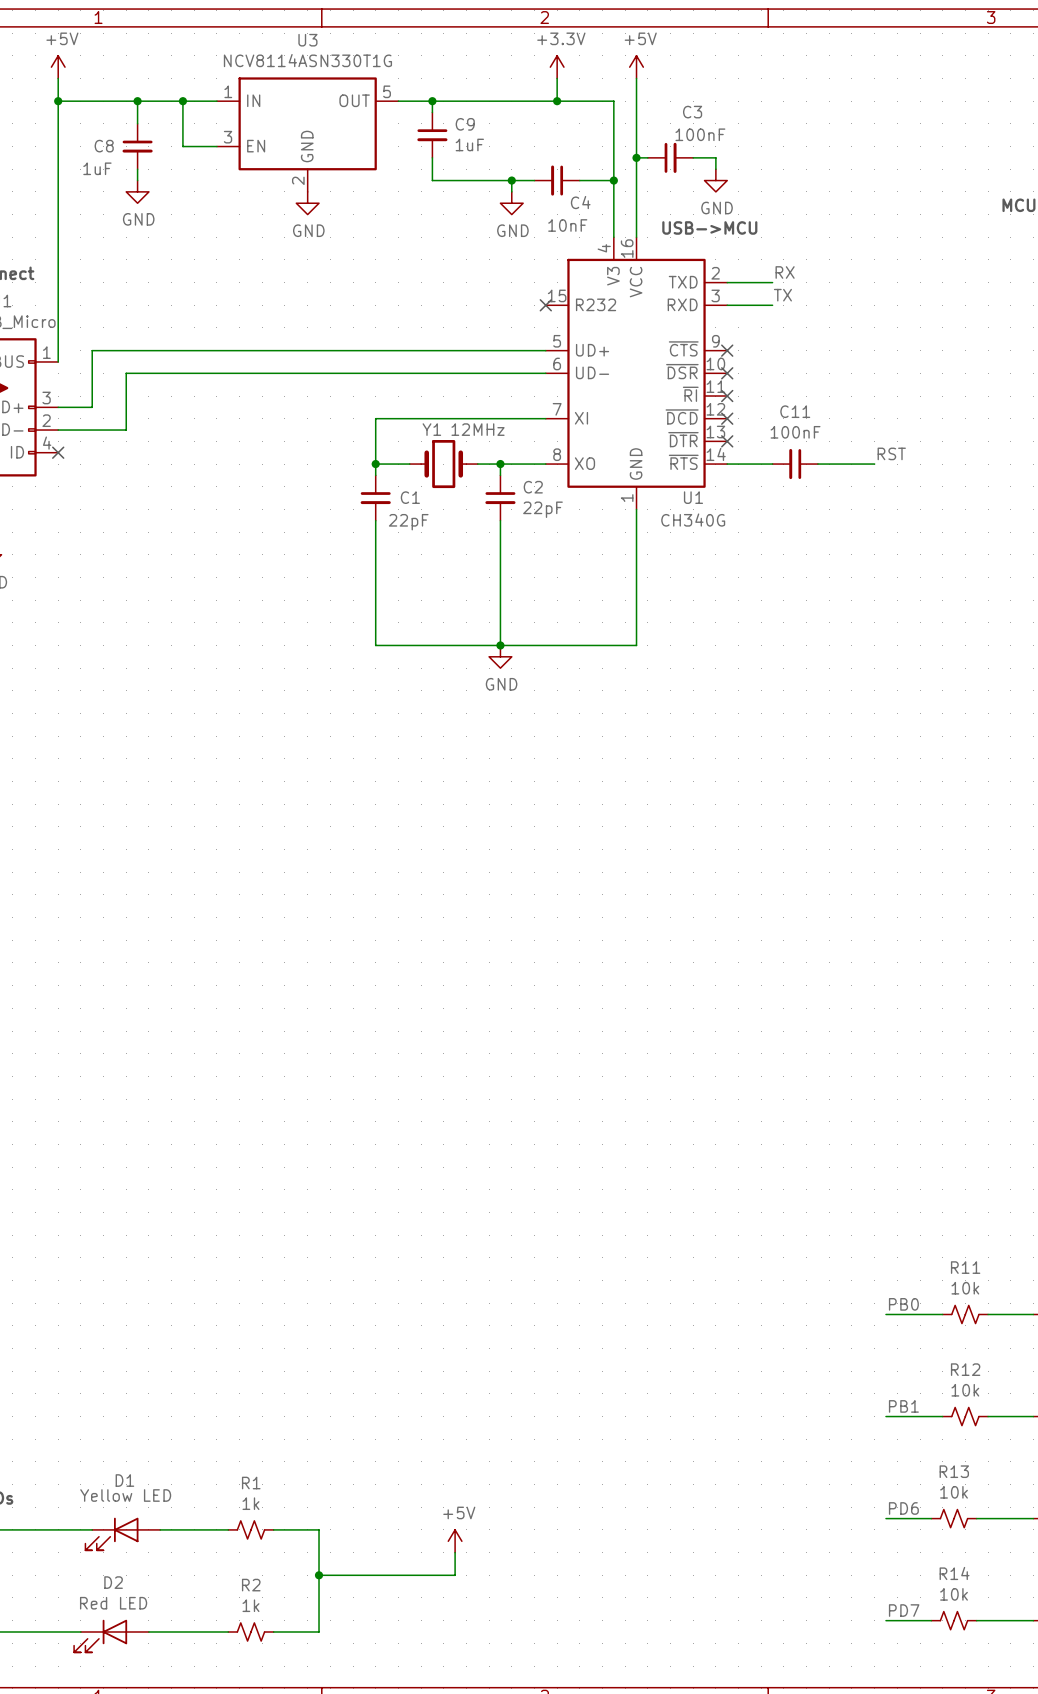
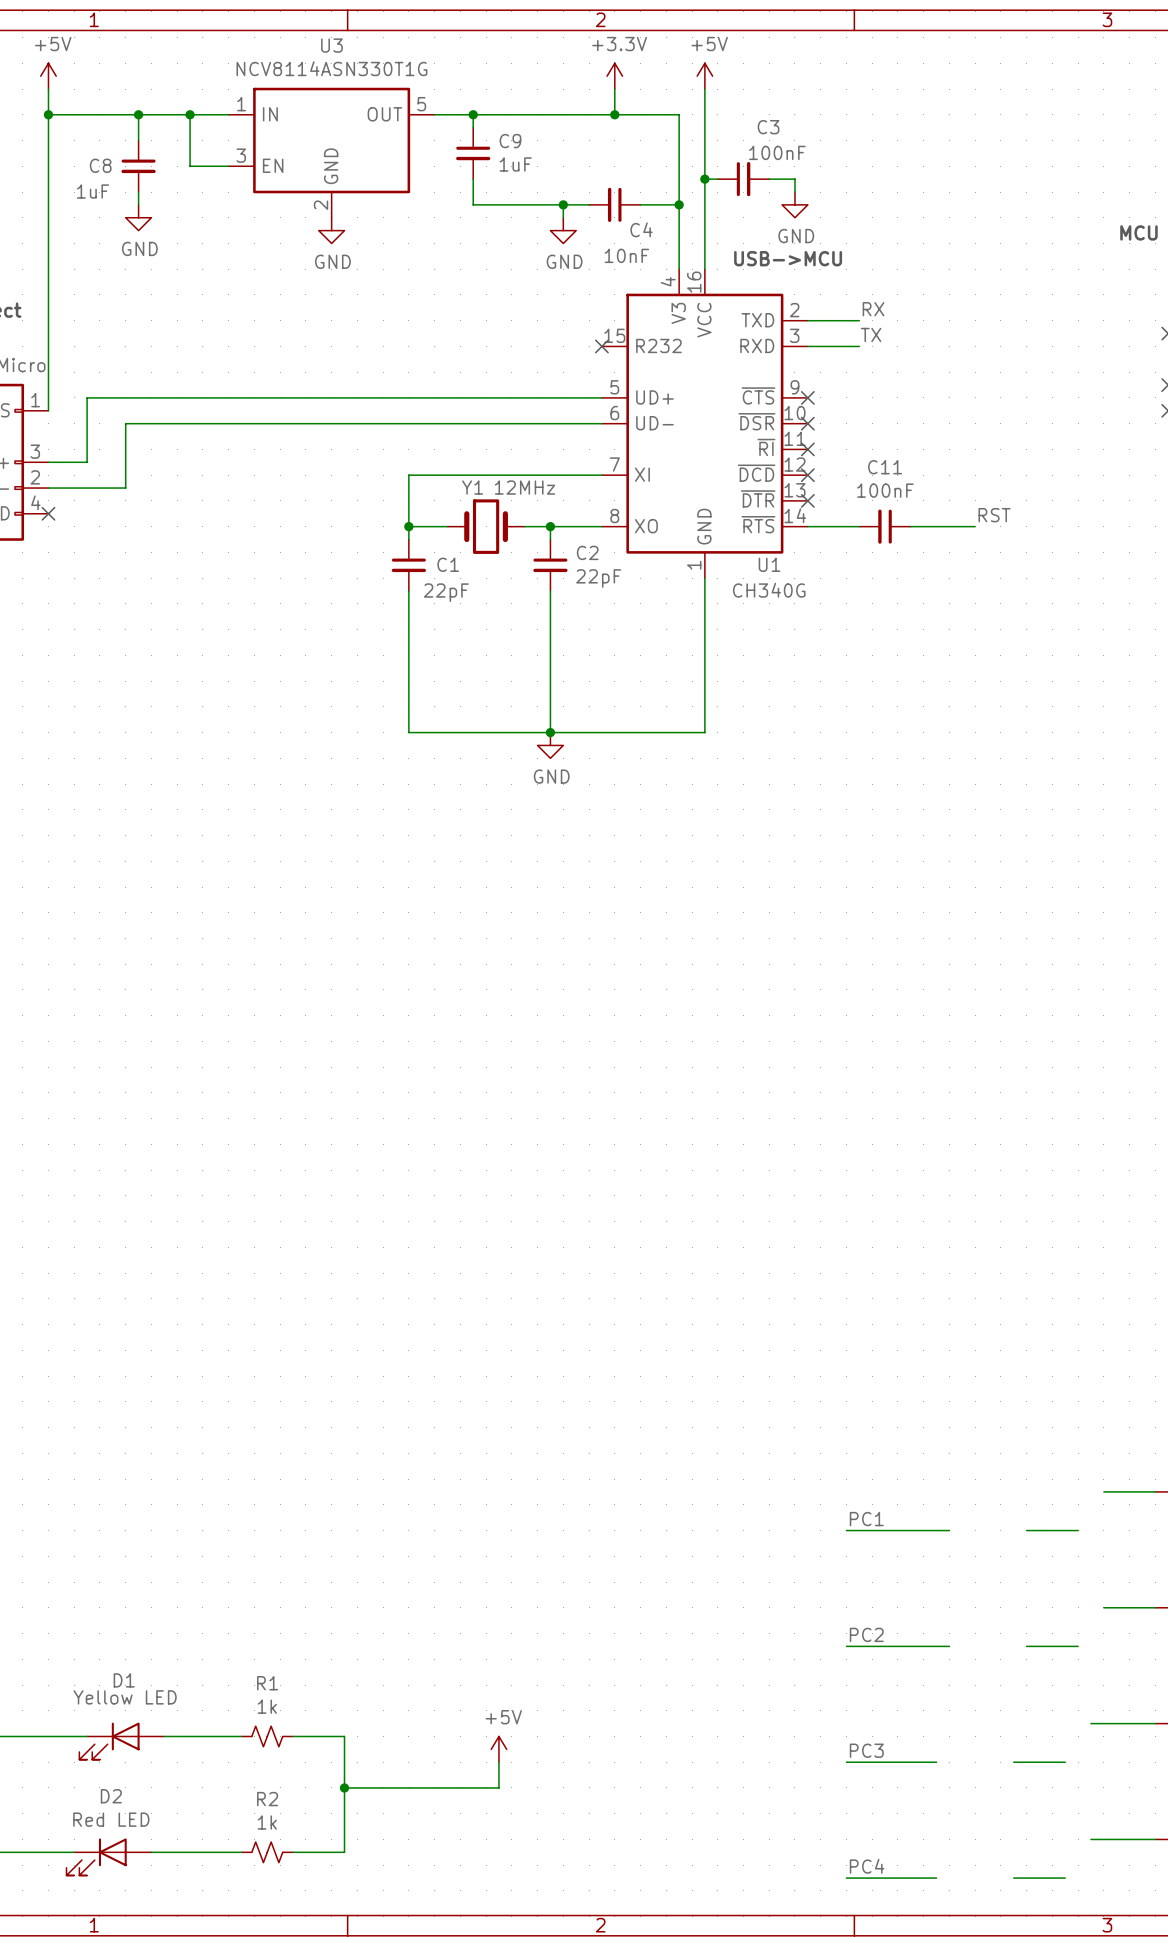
label: PB0 (903, 1304) -> none
wire: (885, 1314) (942, 1314) -> none
R11: 10k (965, 1314) -> none
label: none -> PC1 (866, 1519)
wire: none -> (846, 1530) (949, 1530)
wire: none -> (1026, 1530) (1078, 1530)
label: PB1 (903, 1406) -> none
wire: (885, 1416) (942, 1416) -> none
R12: 10k (965, 1416) -> none
label: none -> PC2 (866, 1634)
wire: none -> (846, 1646) (949, 1646)
wire: none -> (1026, 1646) (1078, 1646)
label: PD6 (903, 1508) -> none
wire: (885, 1518) (931, 1518) -> (1013, 1762) (1065, 1762)
R13: 10k (954, 1518) -> none
label: none -> PC3 (866, 1750)
wire: none -> (846, 1762) (936, 1762)
label: PD7 (904, 1610) -> none
wire: (885, 1620) (931, 1620) -> (1013, 1878) (1065, 1878)
R14: 10k (954, 1620) -> none
label: none -> PC4 (867, 1866)
wire: none -> (846, 1878) (936, 1878)

